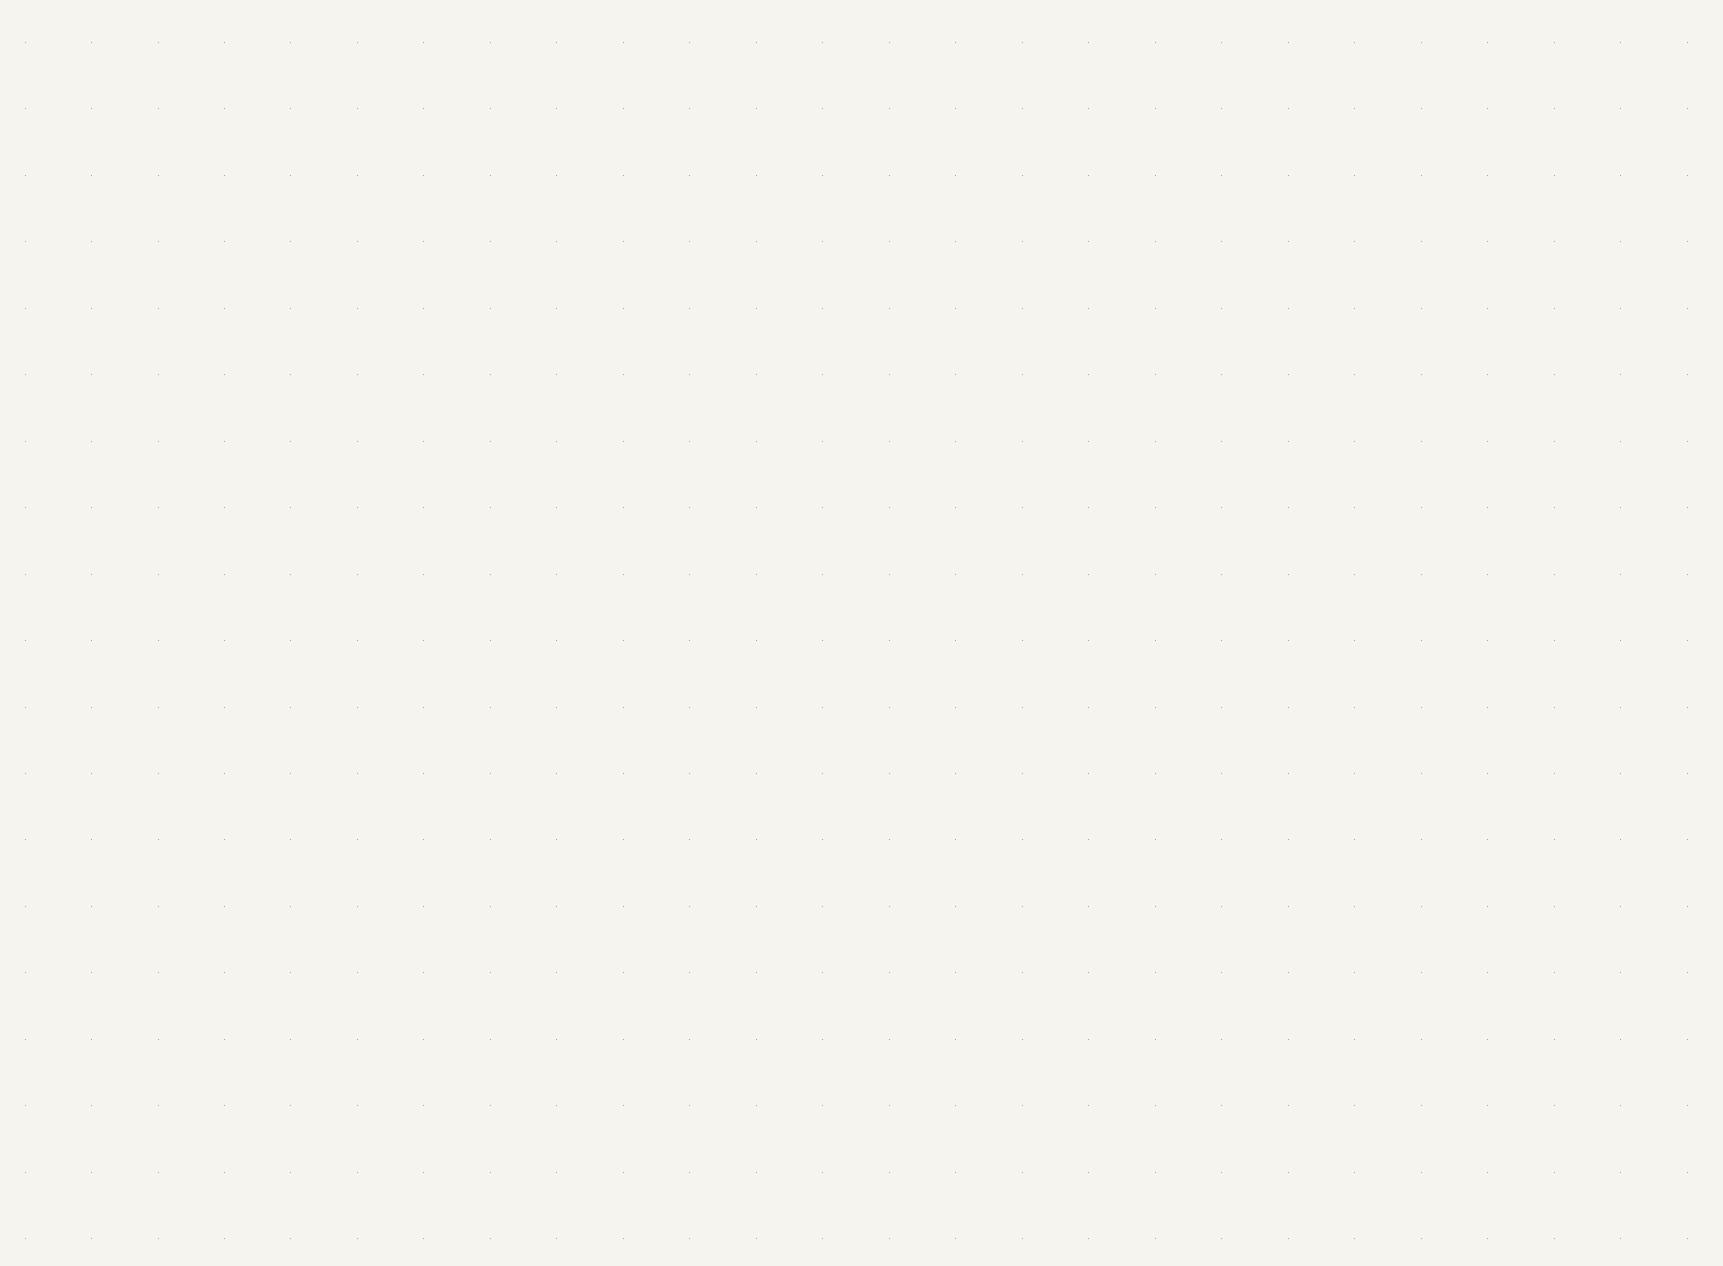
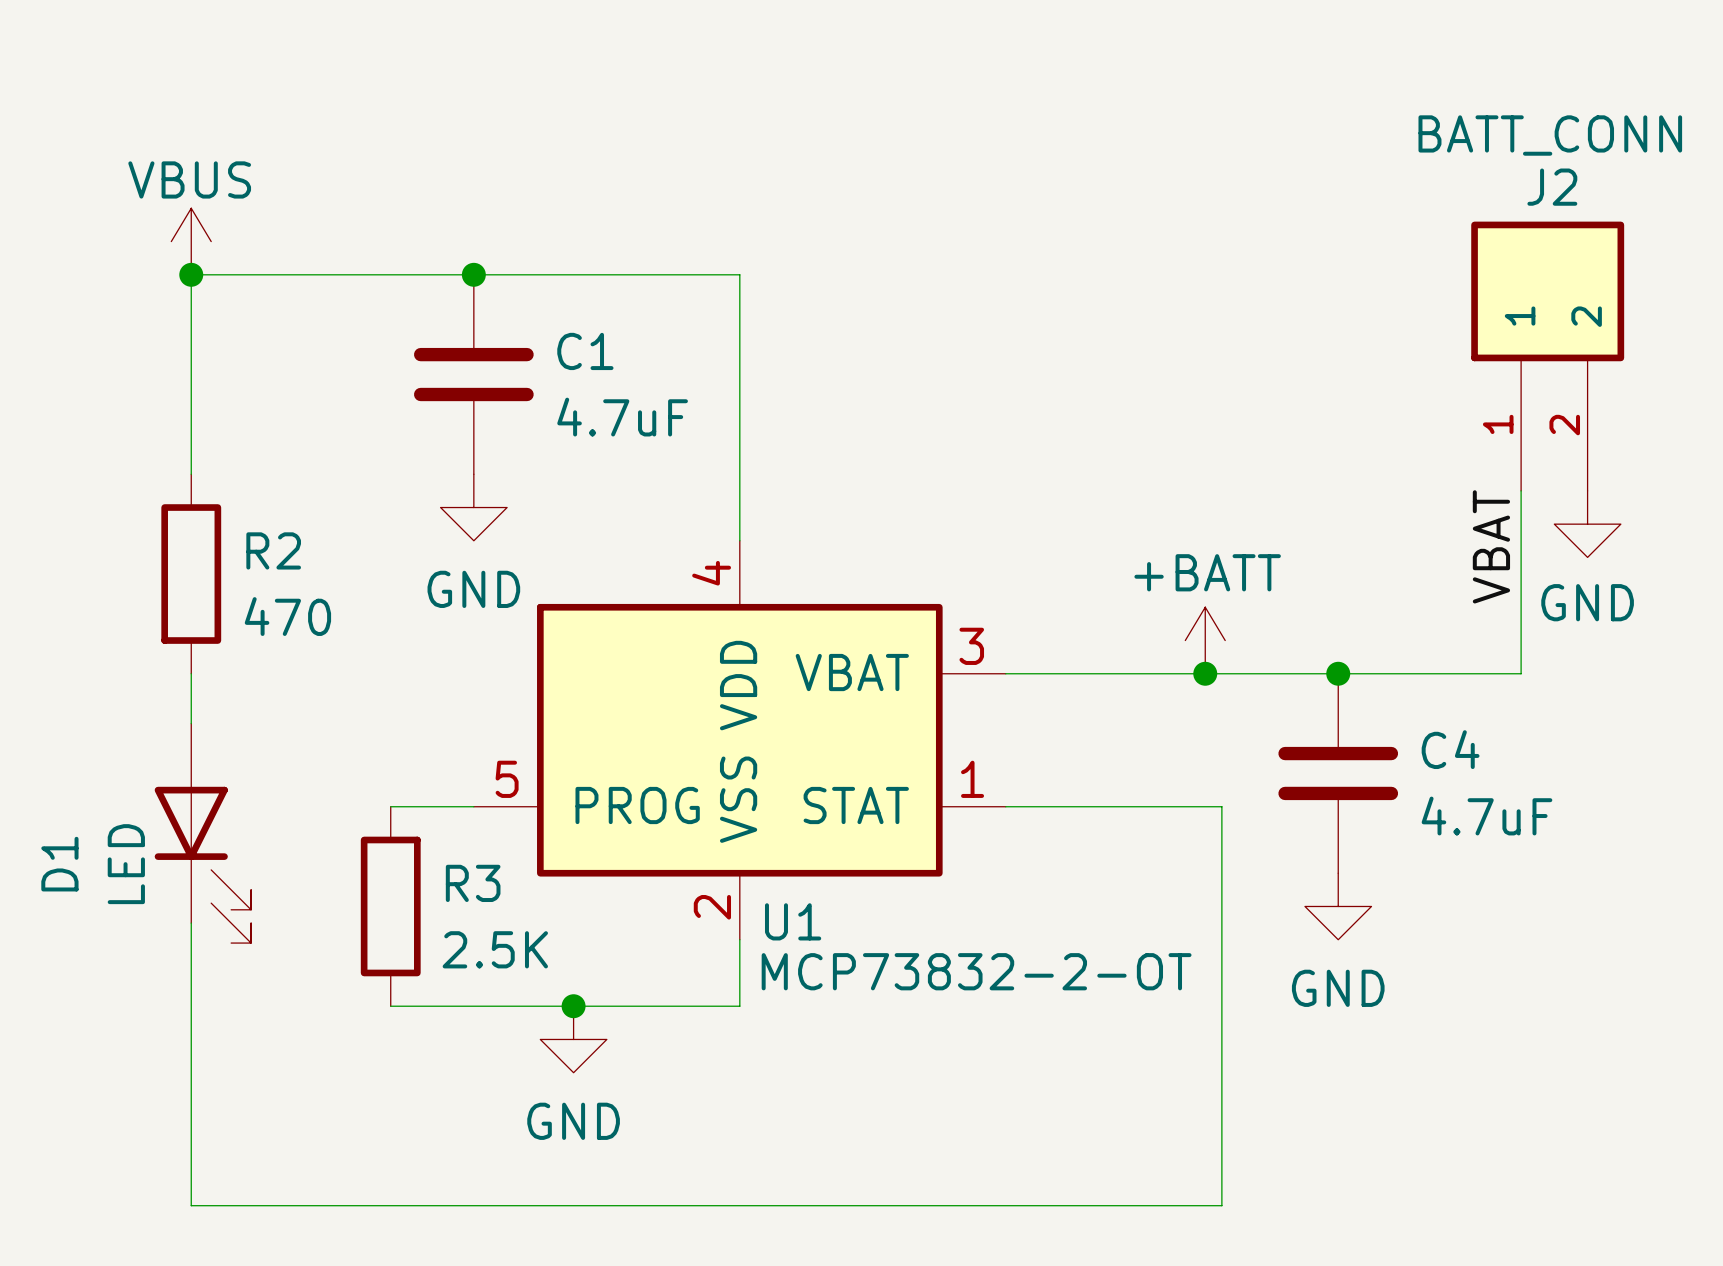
power symbol: none -> VBUS (191, 241)
junction: none -> (191, 274)
junction: none -> (473, 274)
J2: none -> BATT_CONN (1547, 356)
C1: none -> 4.7uF (473, 374)
wire: none -> (191, 474) (191, 274) (739, 274) (739, 540)
wire: none -> (1521, 490) (1521, 673) (1005, 673)
power symbol: none -> GND (473, 507)
power symbol: none -> GND (1587, 524)
label: none -> VBAT (1491, 546)
R2: none -> 470 (191, 574)
power symbol: none -> +BATT (1205, 640)
wire: none -> (191, 673) (191, 723)
junction: none -> (1205, 673)
junction: none -> (1338, 673)
U1: none -> MCP73832-2-OT (739, 740)
C4: none -> 4.7uF (1338, 773)
wire: none -> (390, 806) (473, 806)
wire: none -> (1005, 806) (1221, 806) (1221, 1205) (191, 1205) (191, 923)
D1: none -> LED (202, 833)
R3: none -> 2.5K (390, 906)
power symbol: none -> GND (1338, 906)
wire: none -> (739, 939) (739, 1006) (390, 1006)
junction: none -> (573, 1006)
power symbol: none -> GND (573, 1039)

